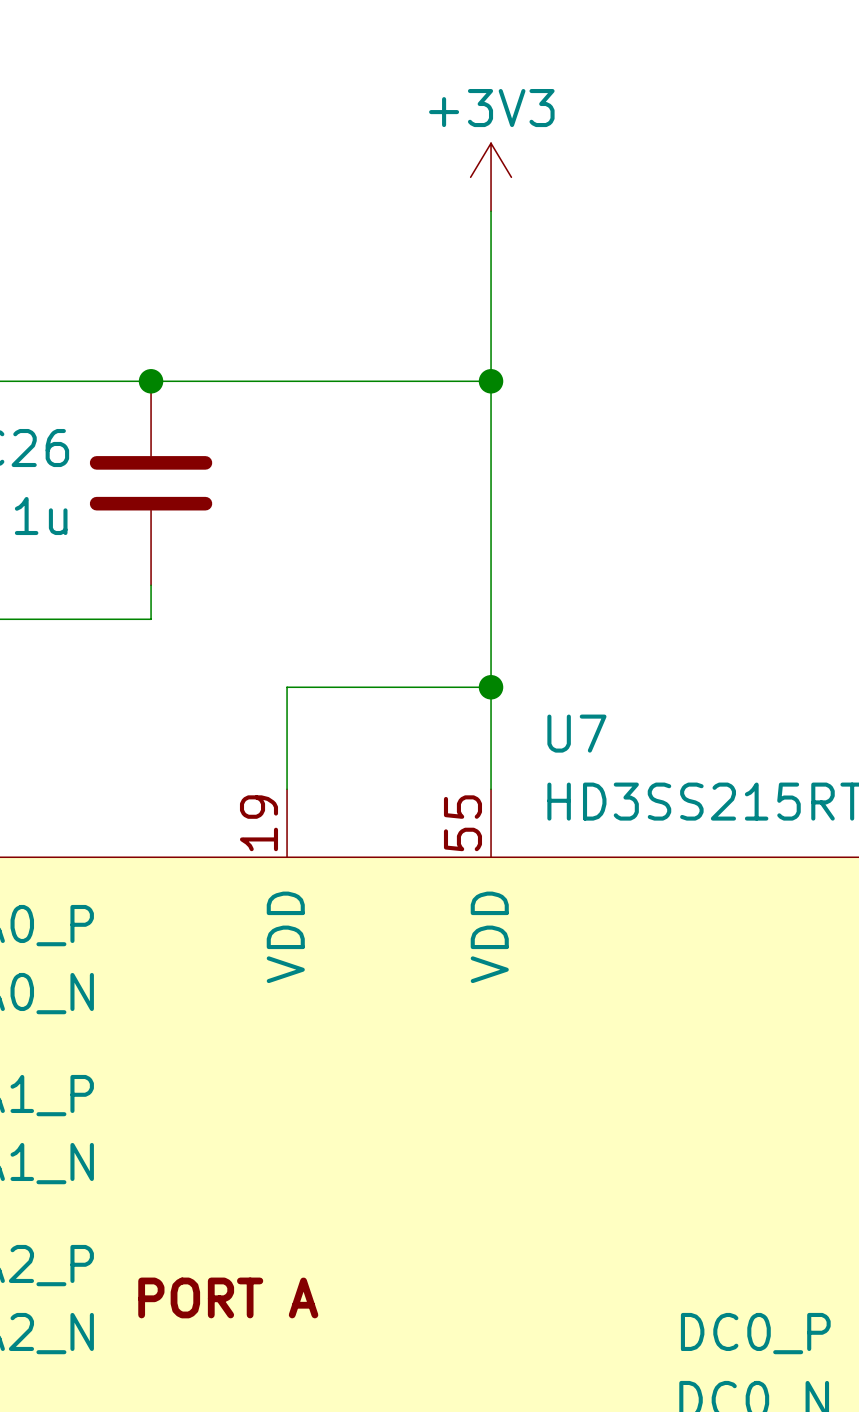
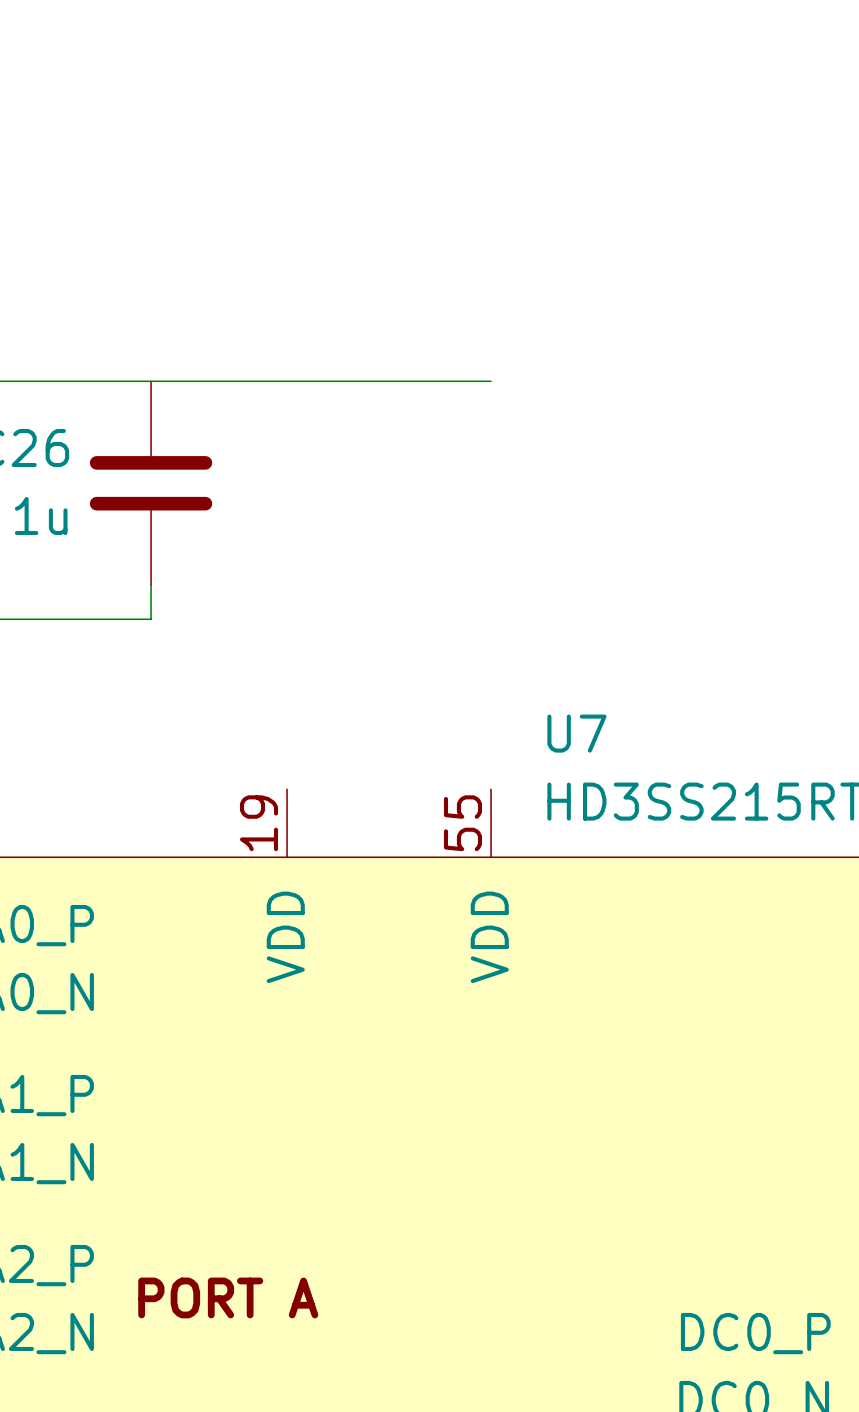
power symbol: +3V3 (491, 177) -> none
wire: (491, 211) (491, 789) -> none
junction: (151, 381) -> none
junction: (491, 381) -> none
wire: (491, 687) (287, 687) (287, 789) -> none
junction: (491, 687) -> none

